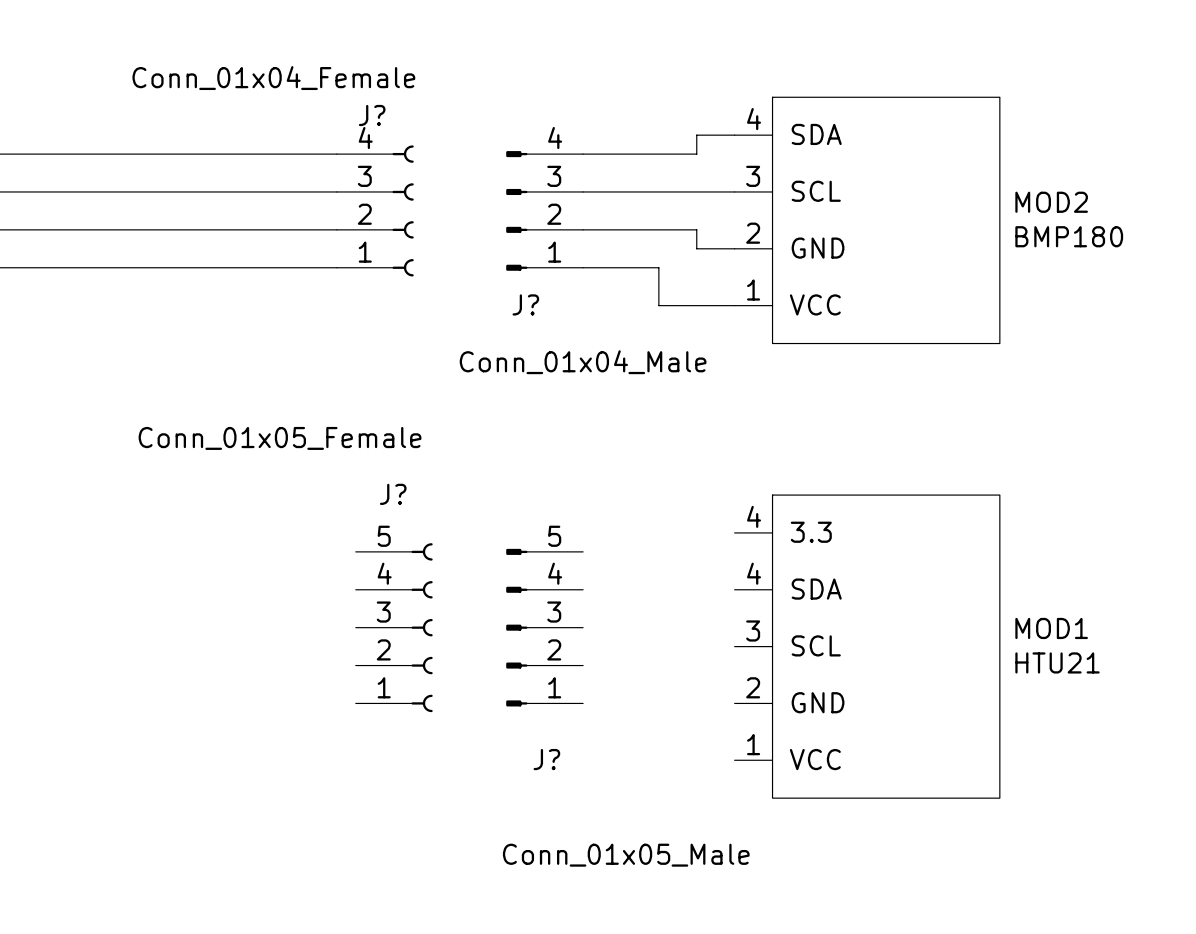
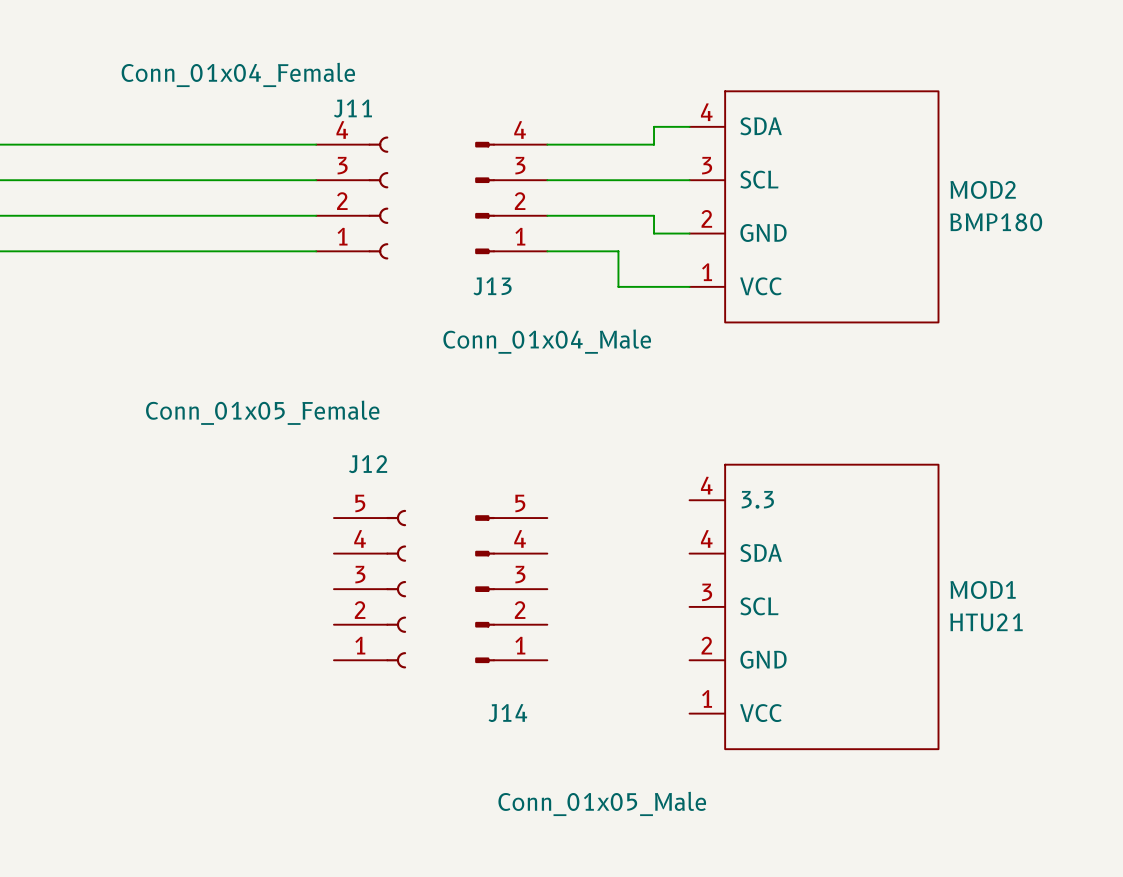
J? name: J? (372, 115) -> J11 (352, 108)
J? name: J? (525, 304) -> J13 (492, 286)
J? name: J? (393, 494) -> J12 (368, 464)
J? name: J? (546, 759) -> J14 (507, 713)

